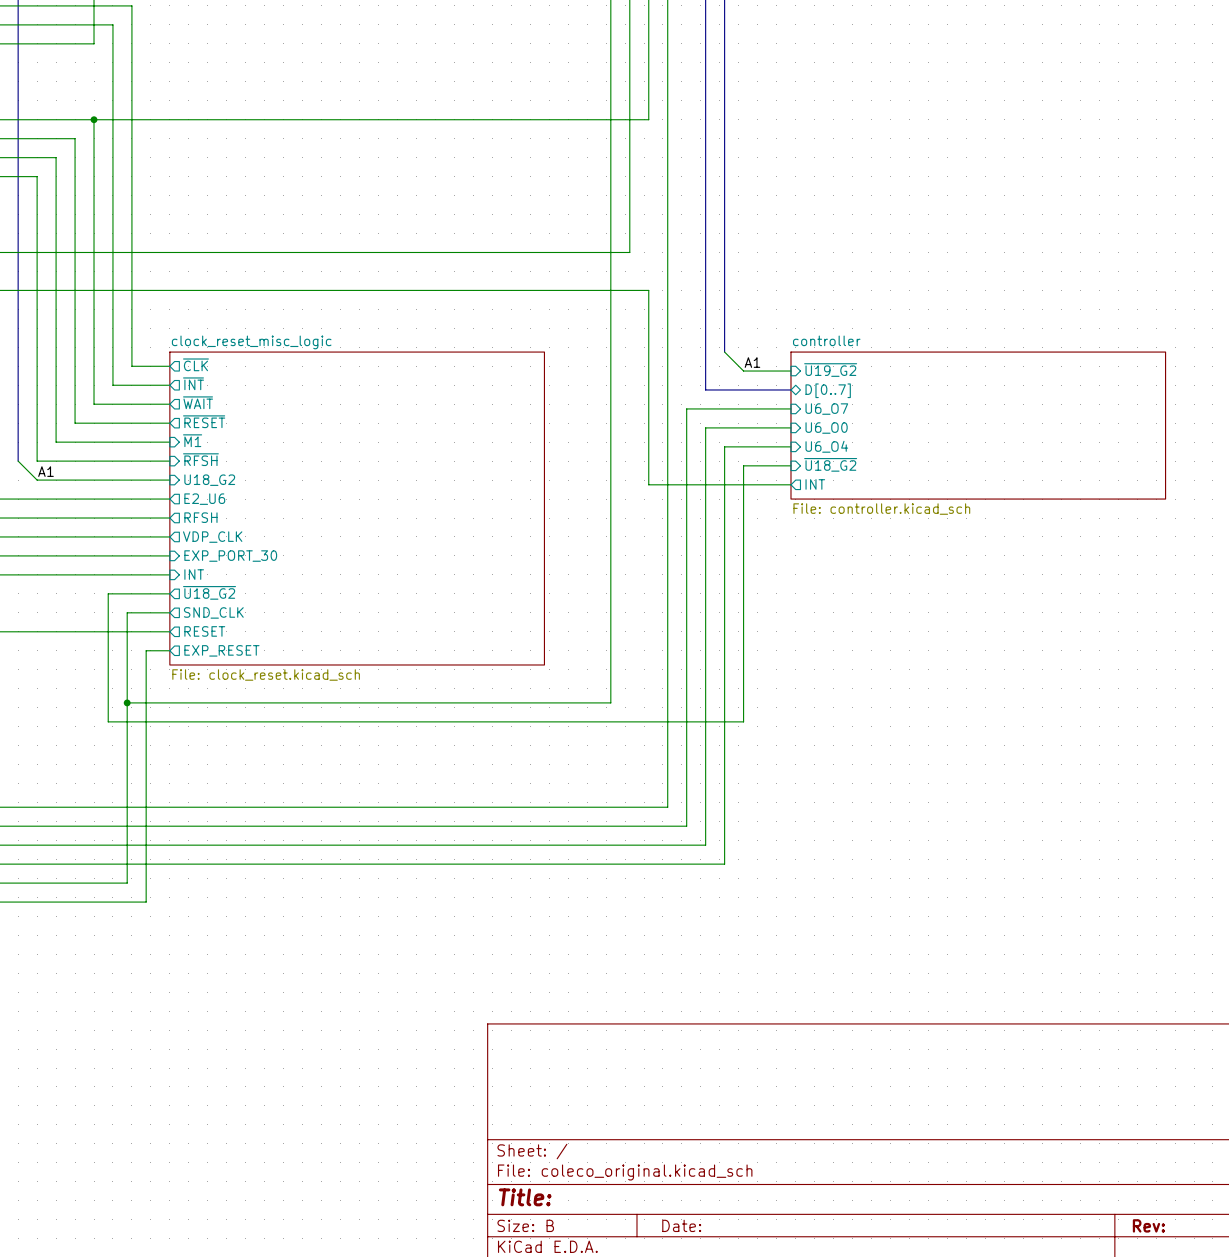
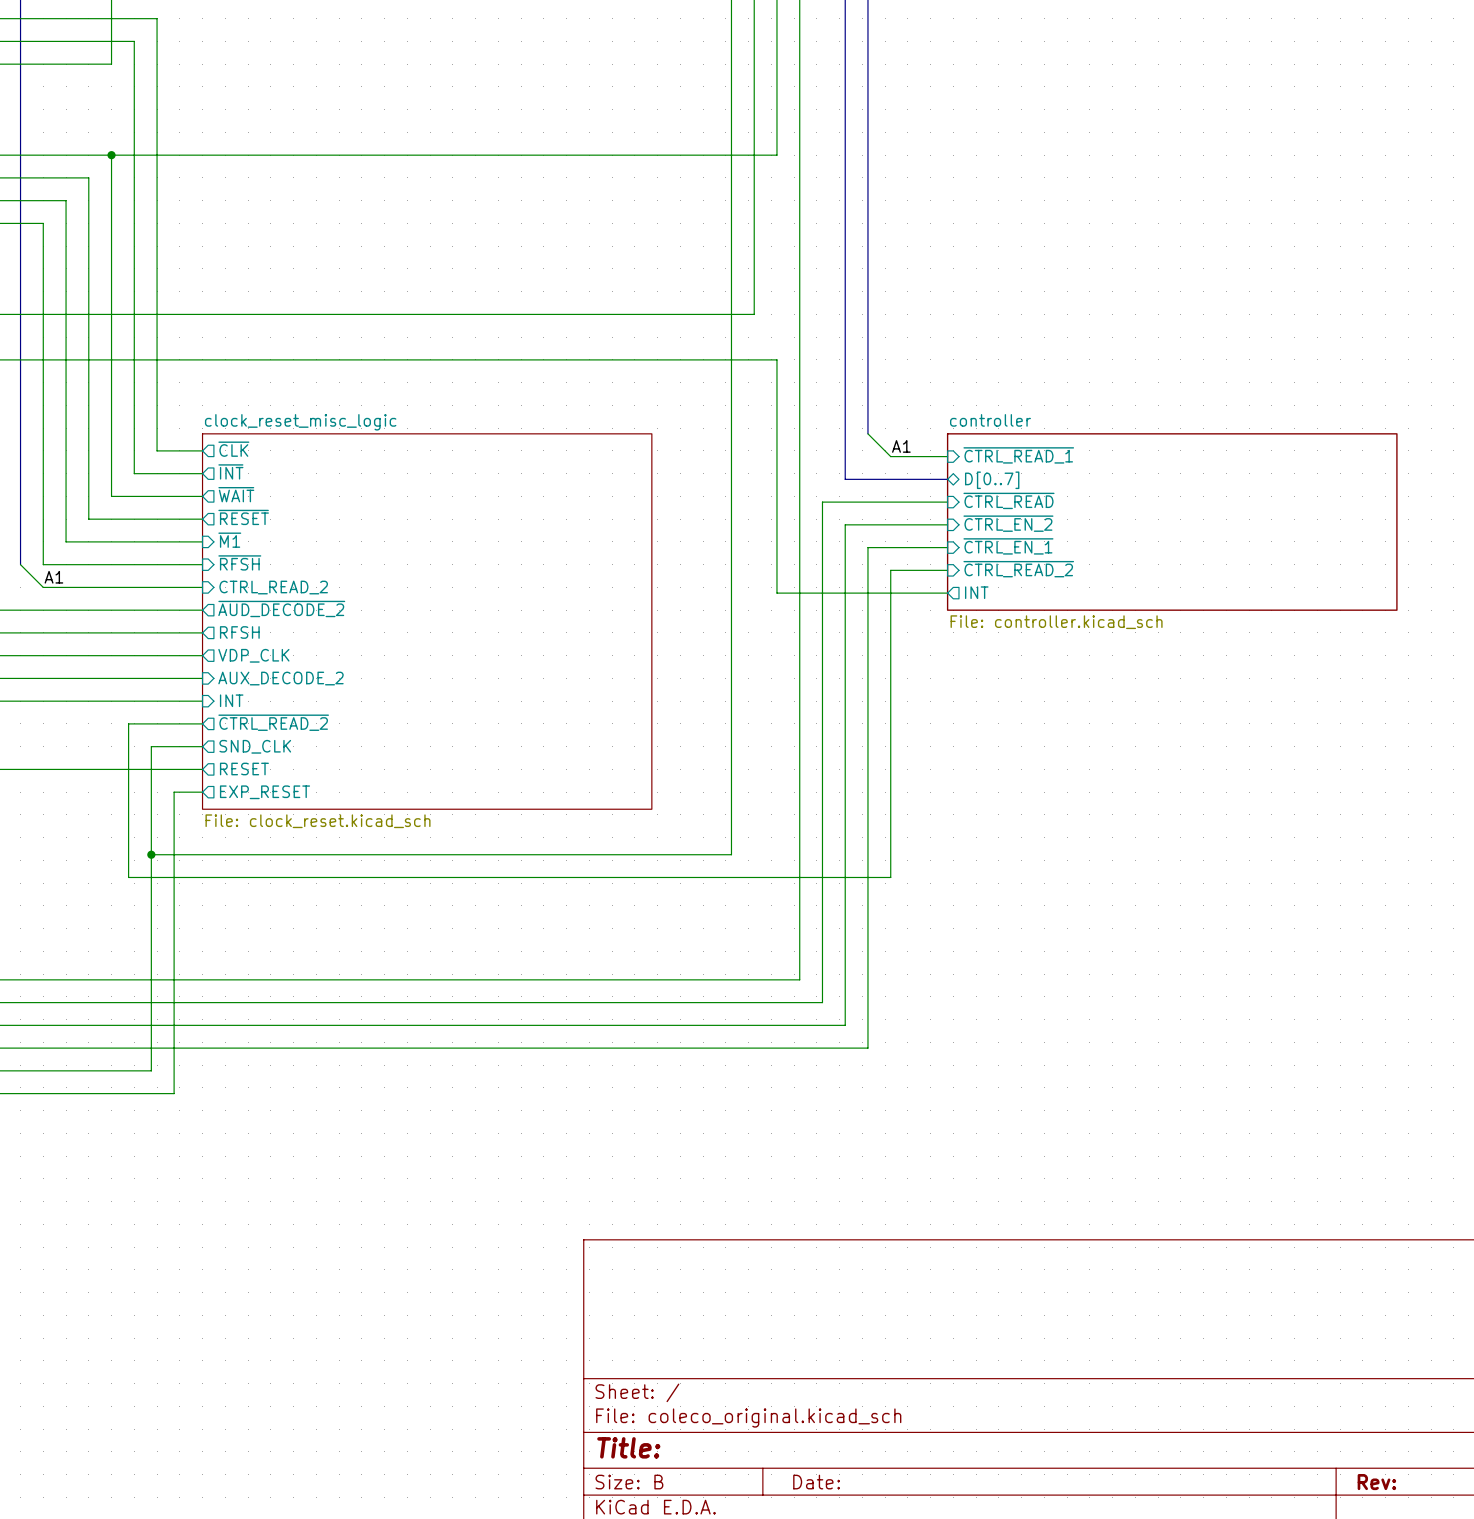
sheet pin: ~{U19_G2} (830, 370) -> ~{CTRL_READ_1} (1018, 455)
sheet pin: U6_O7 (826, 409) -> ~{CTRL_READ} (1008, 500)
sheet pin: U6_O0 (826, 428) -> ~{CTRL_EN_2} (1008, 523)
sheet pin: U6_O4 (826, 446) -> ~{CTRL_EN_1} (1008, 546)
sheet pin: ~{U18_G2} (830, 464) -> ~{CTRL_READ_2} (1018, 569)
sheet pin: U18_G2 (209, 480) -> CTRL_READ_2 (273, 587)
sheet pin: E2_U6 (204, 499) -> ~{AUD_DECODE_2} (281, 608)
sheet pin: EXP_PORT_30 (230, 556) -> AUX_DECODE_2 (280, 678)
sheet pin: ~{U18_G2} (209, 592) -> ~{CTRL_READ_2} (273, 722)

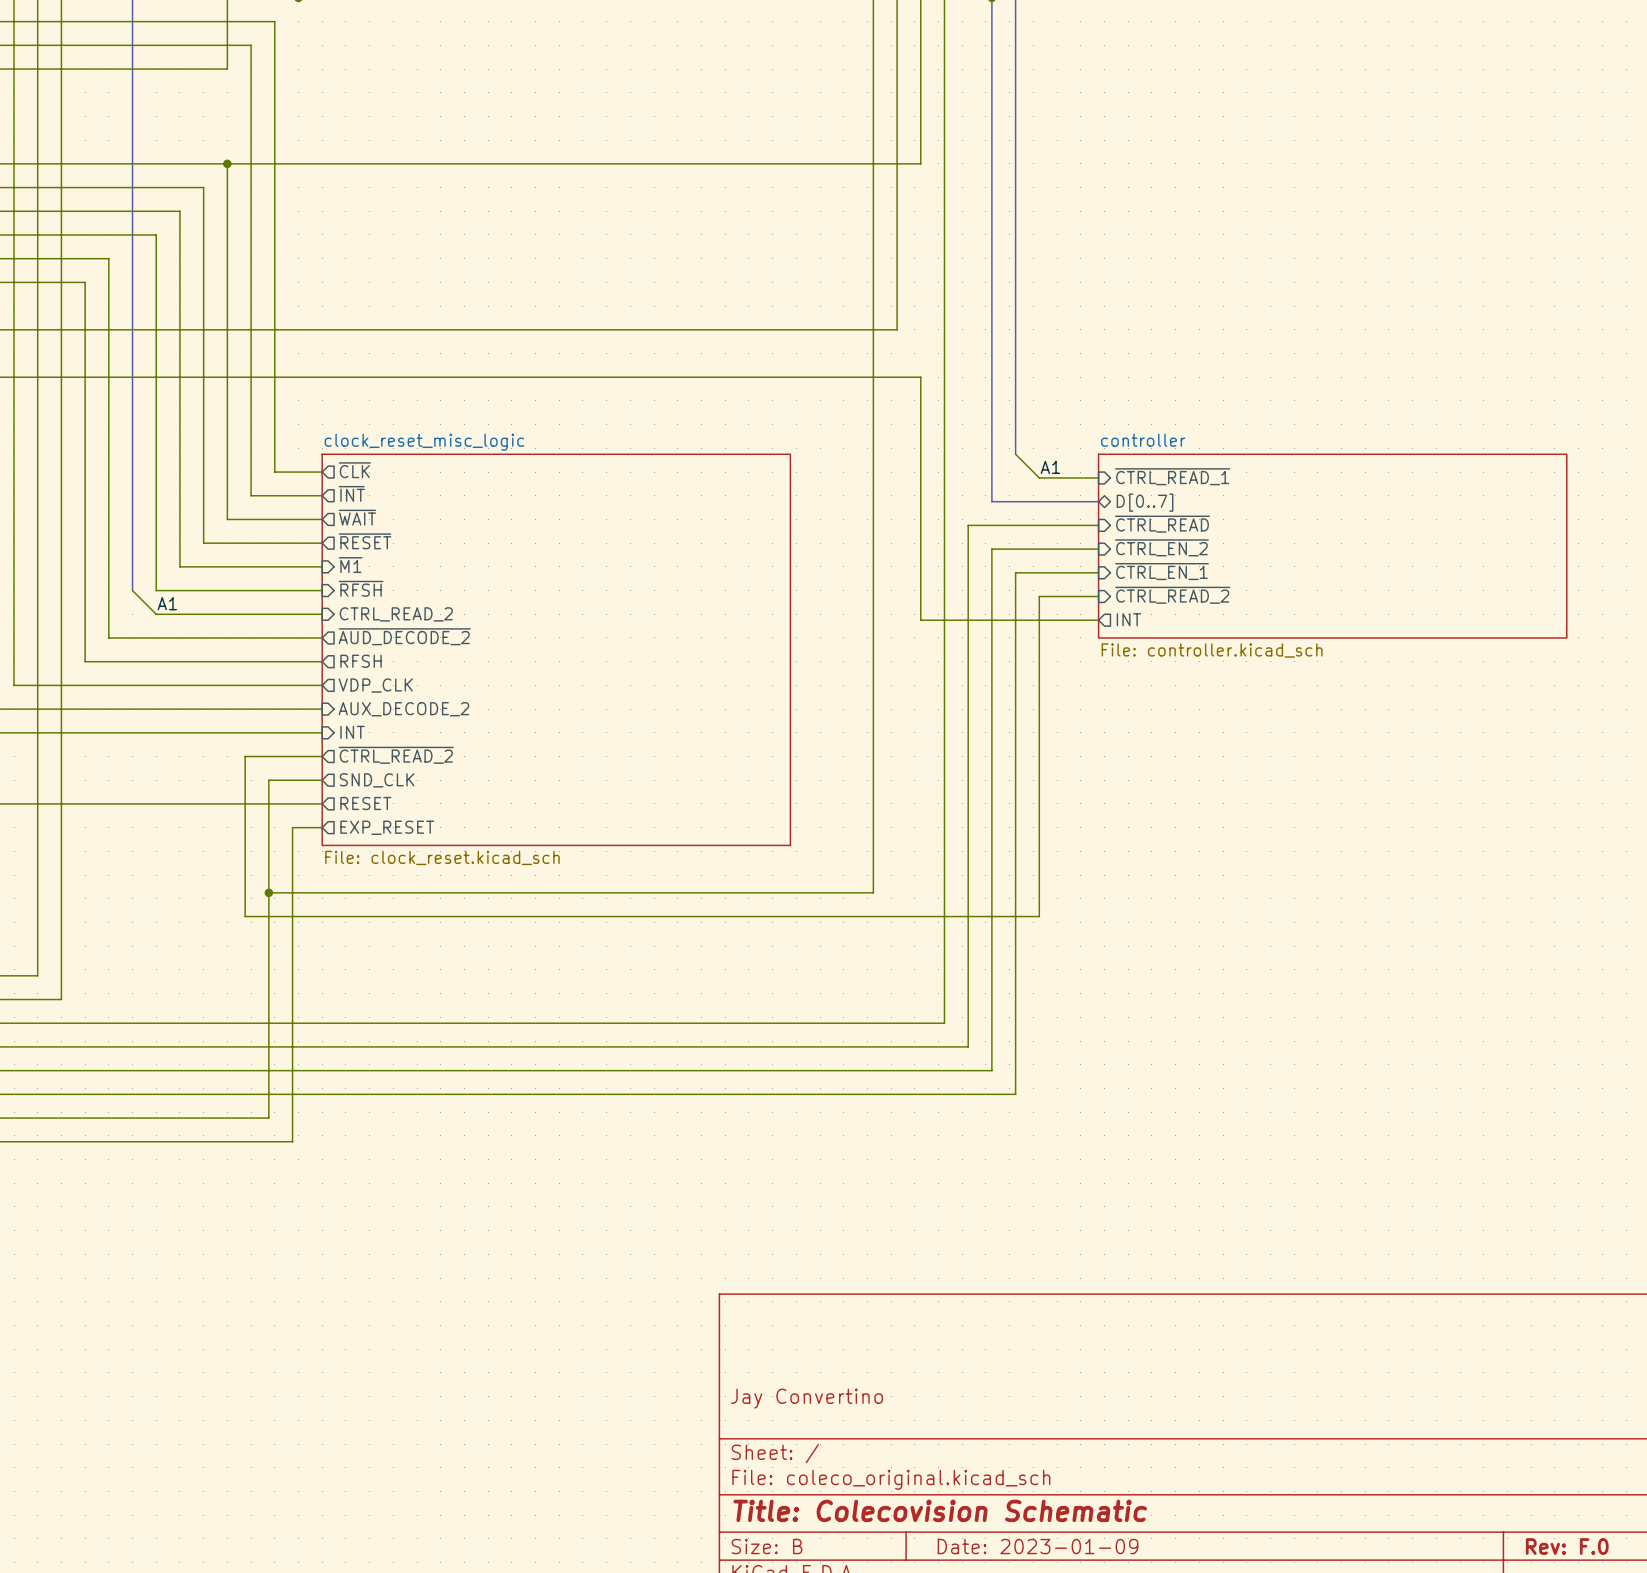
title block: none -> Jay Convertino (807, 1398)
title block: Title: (628, 1447) -> Title: Colecovision Schematic (940, 1510)
title block: Date: (816, 1482) -> Date: 2023-01-09 (1038, 1546)
title block: Rev: (1376, 1482) -> Rev: F.0 (1567, 1546)

